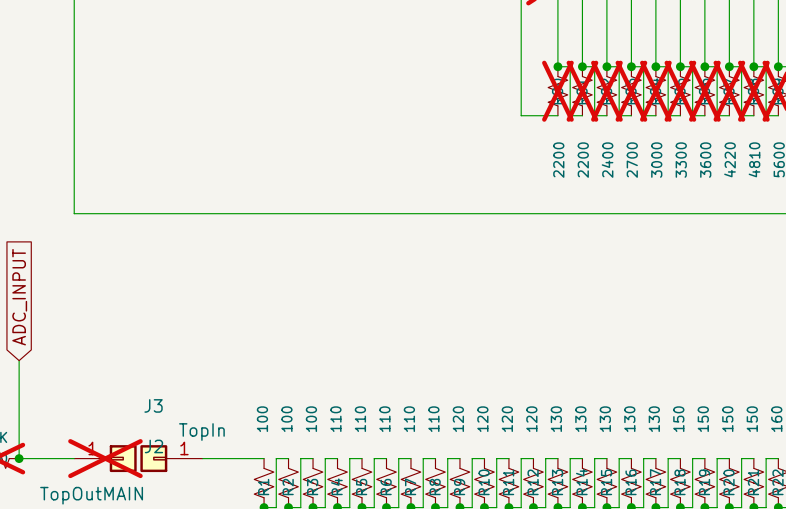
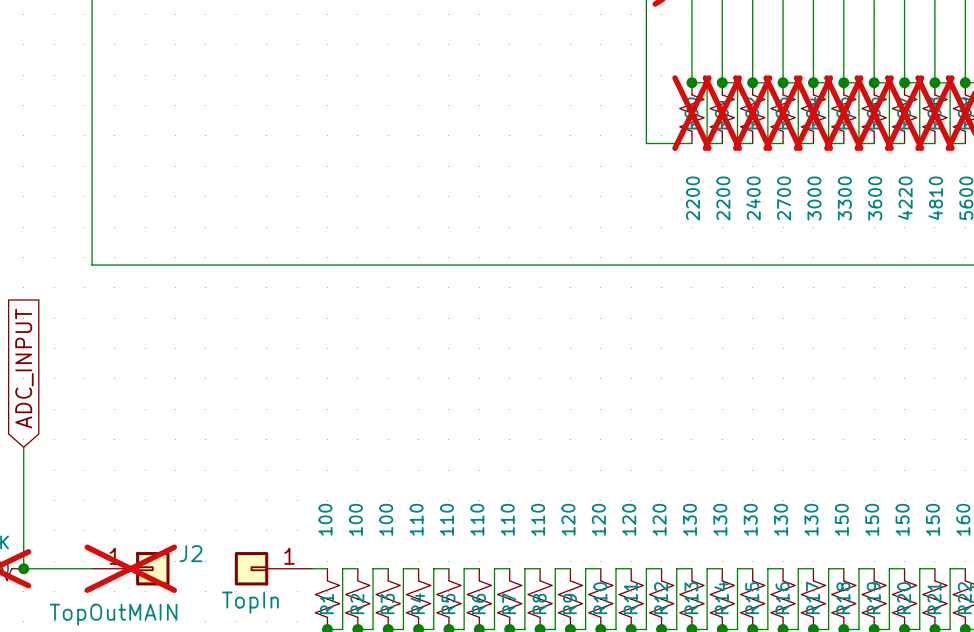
J3: TopIn (171, 458) -> none
part: none -> TopIn (273, 568)

